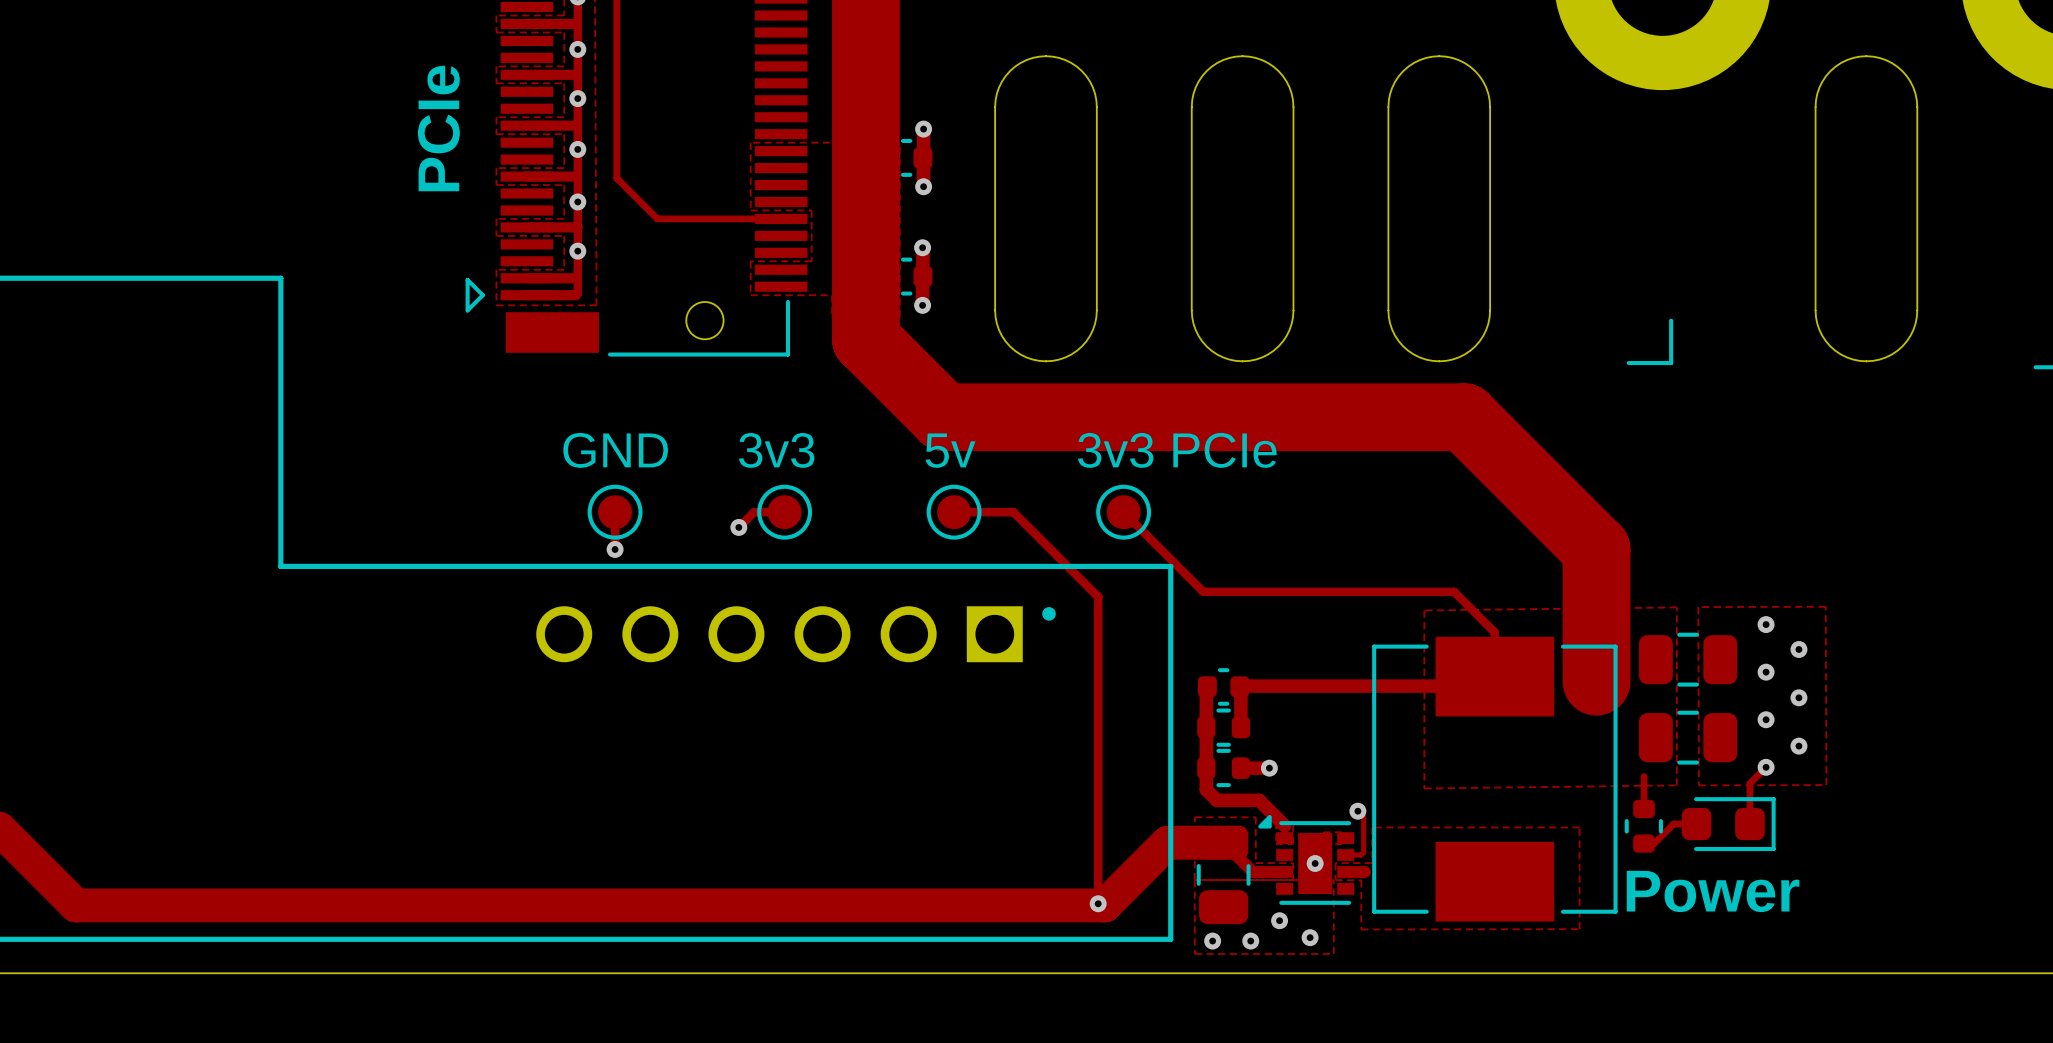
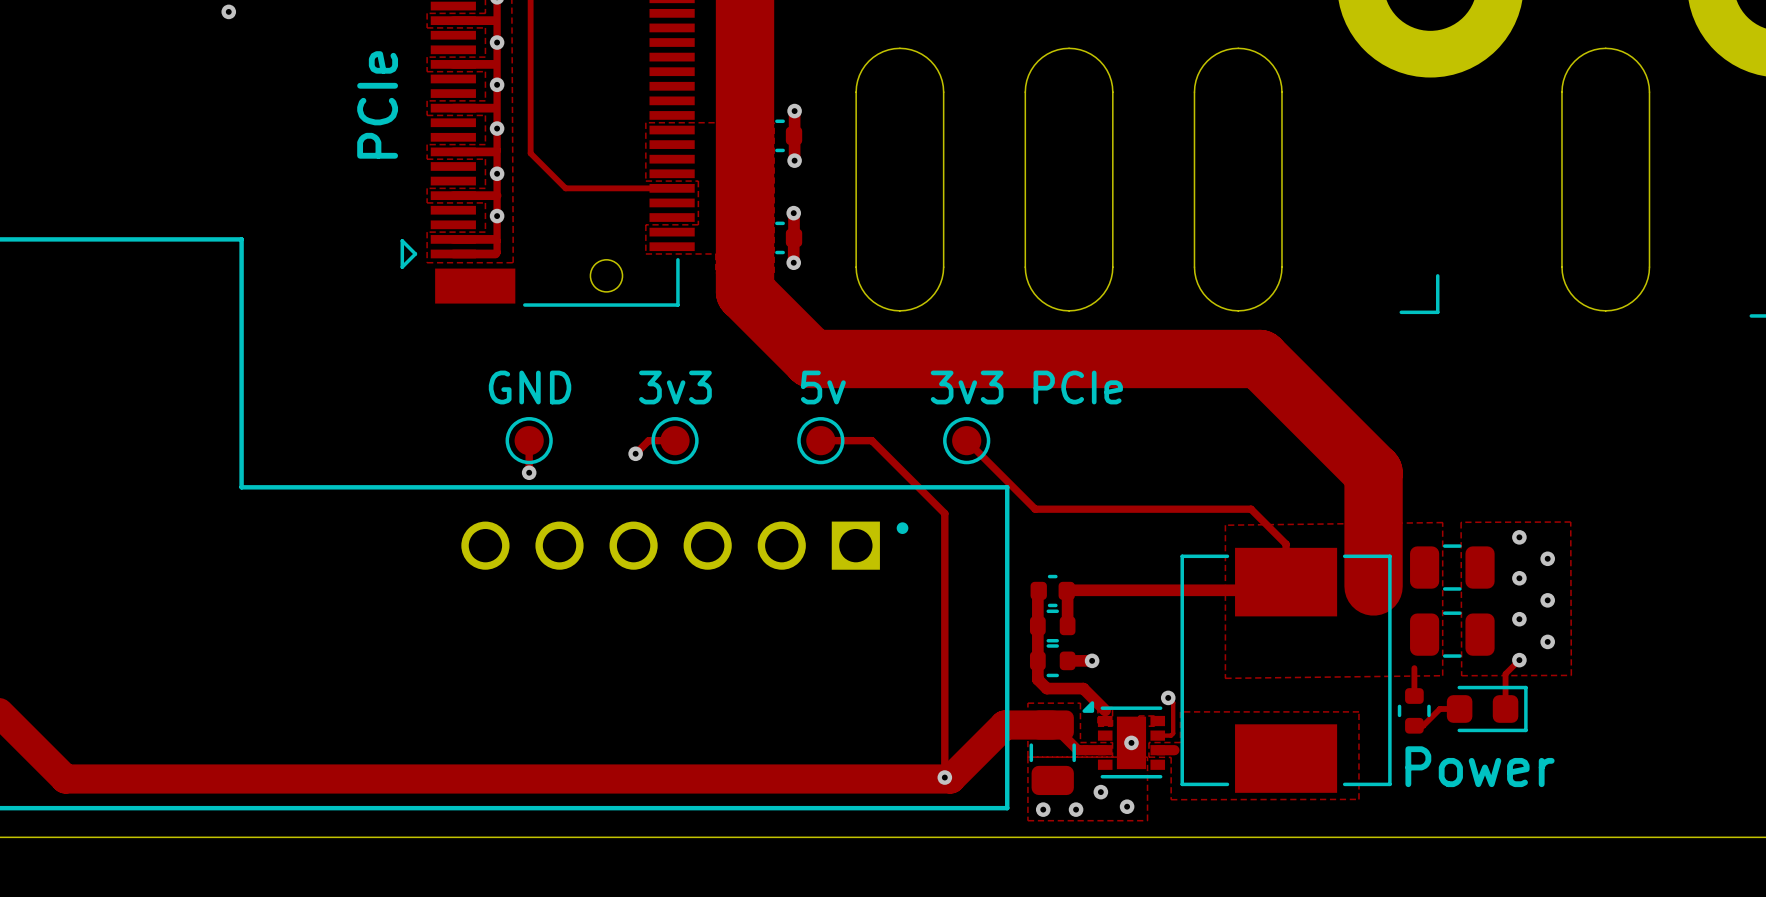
via: none -> (228, 11)

